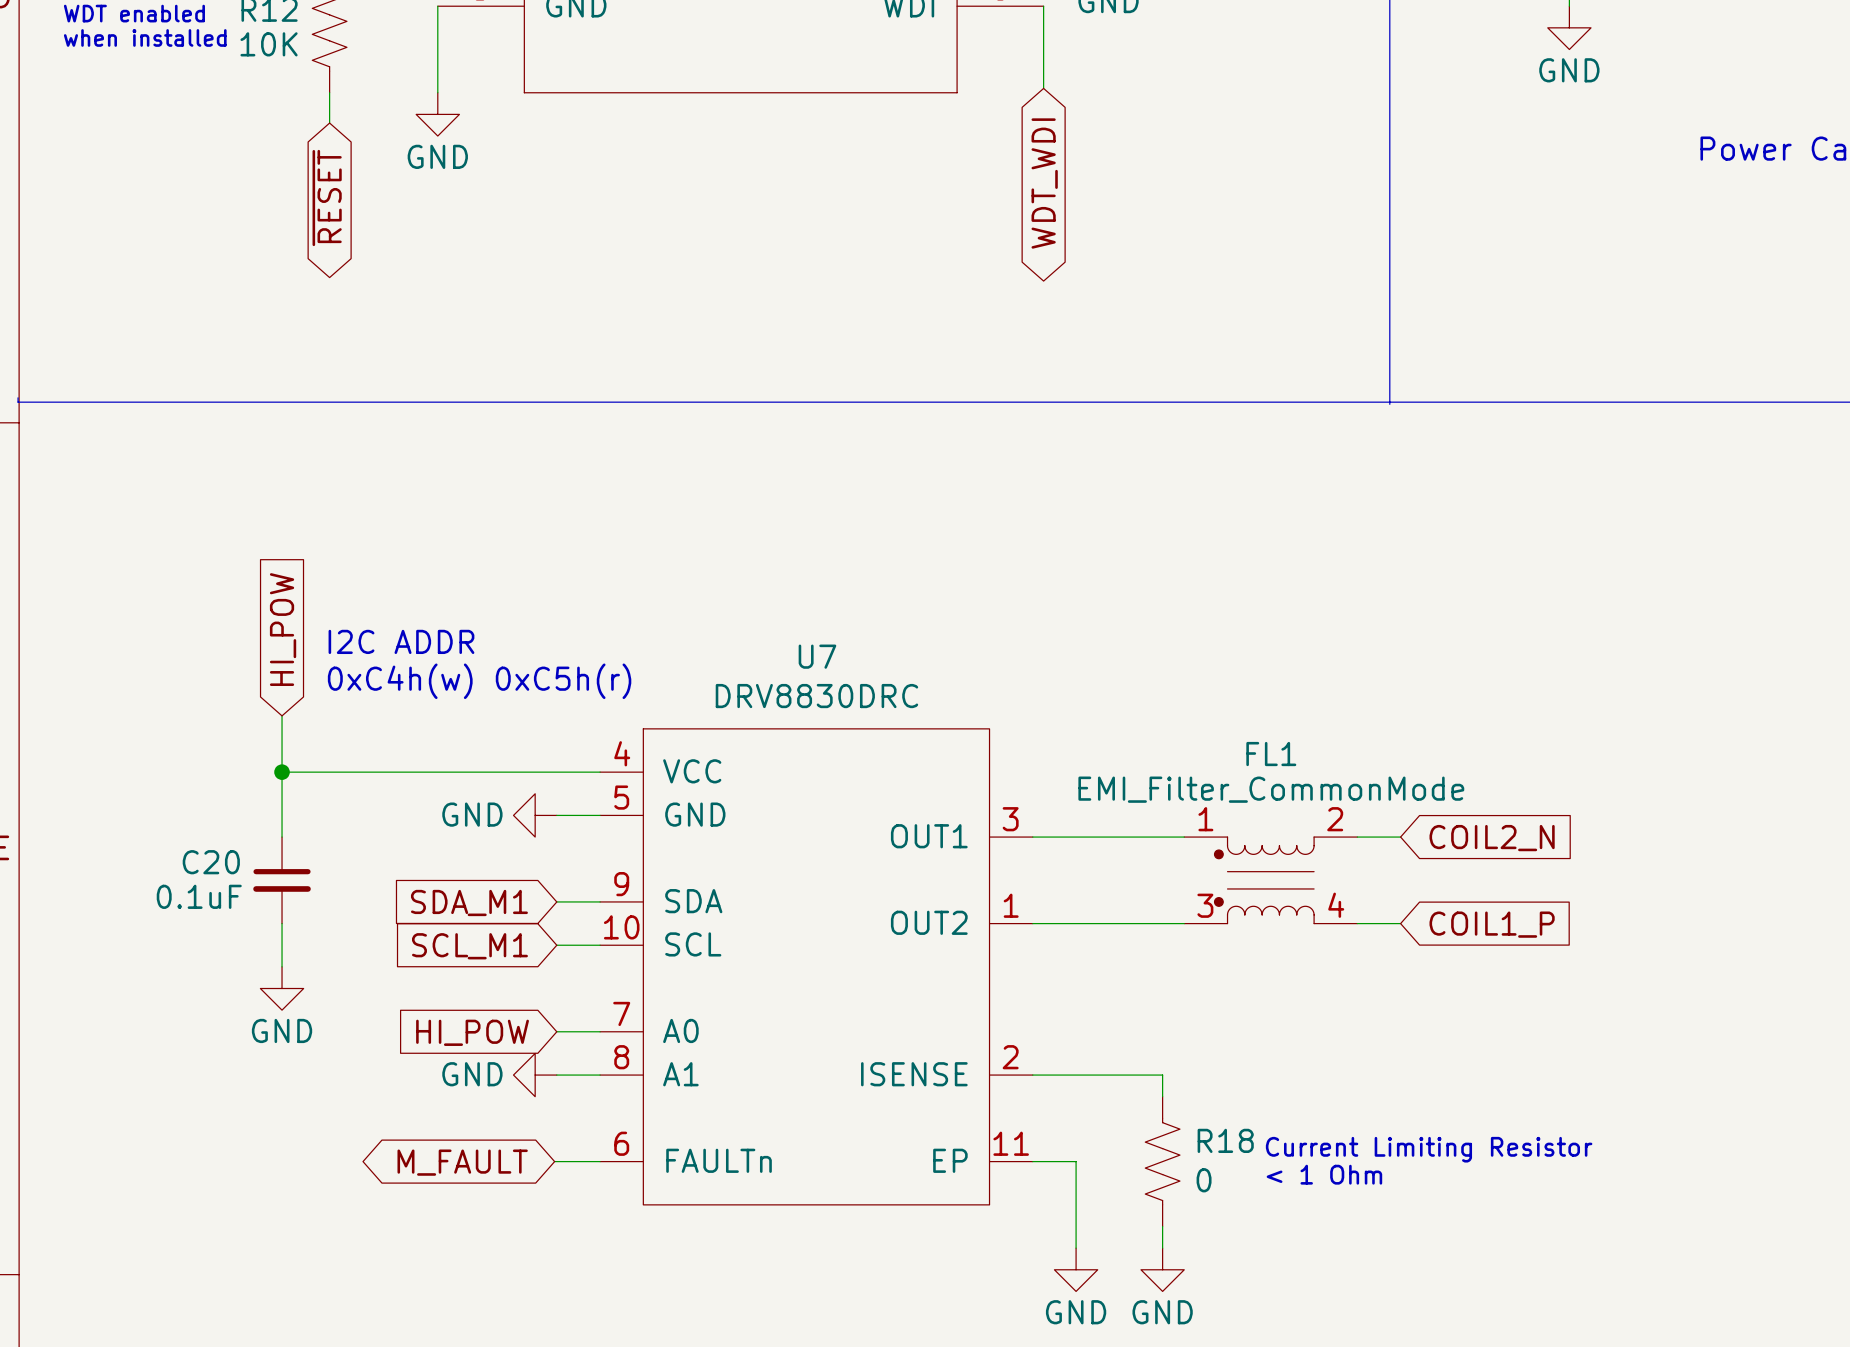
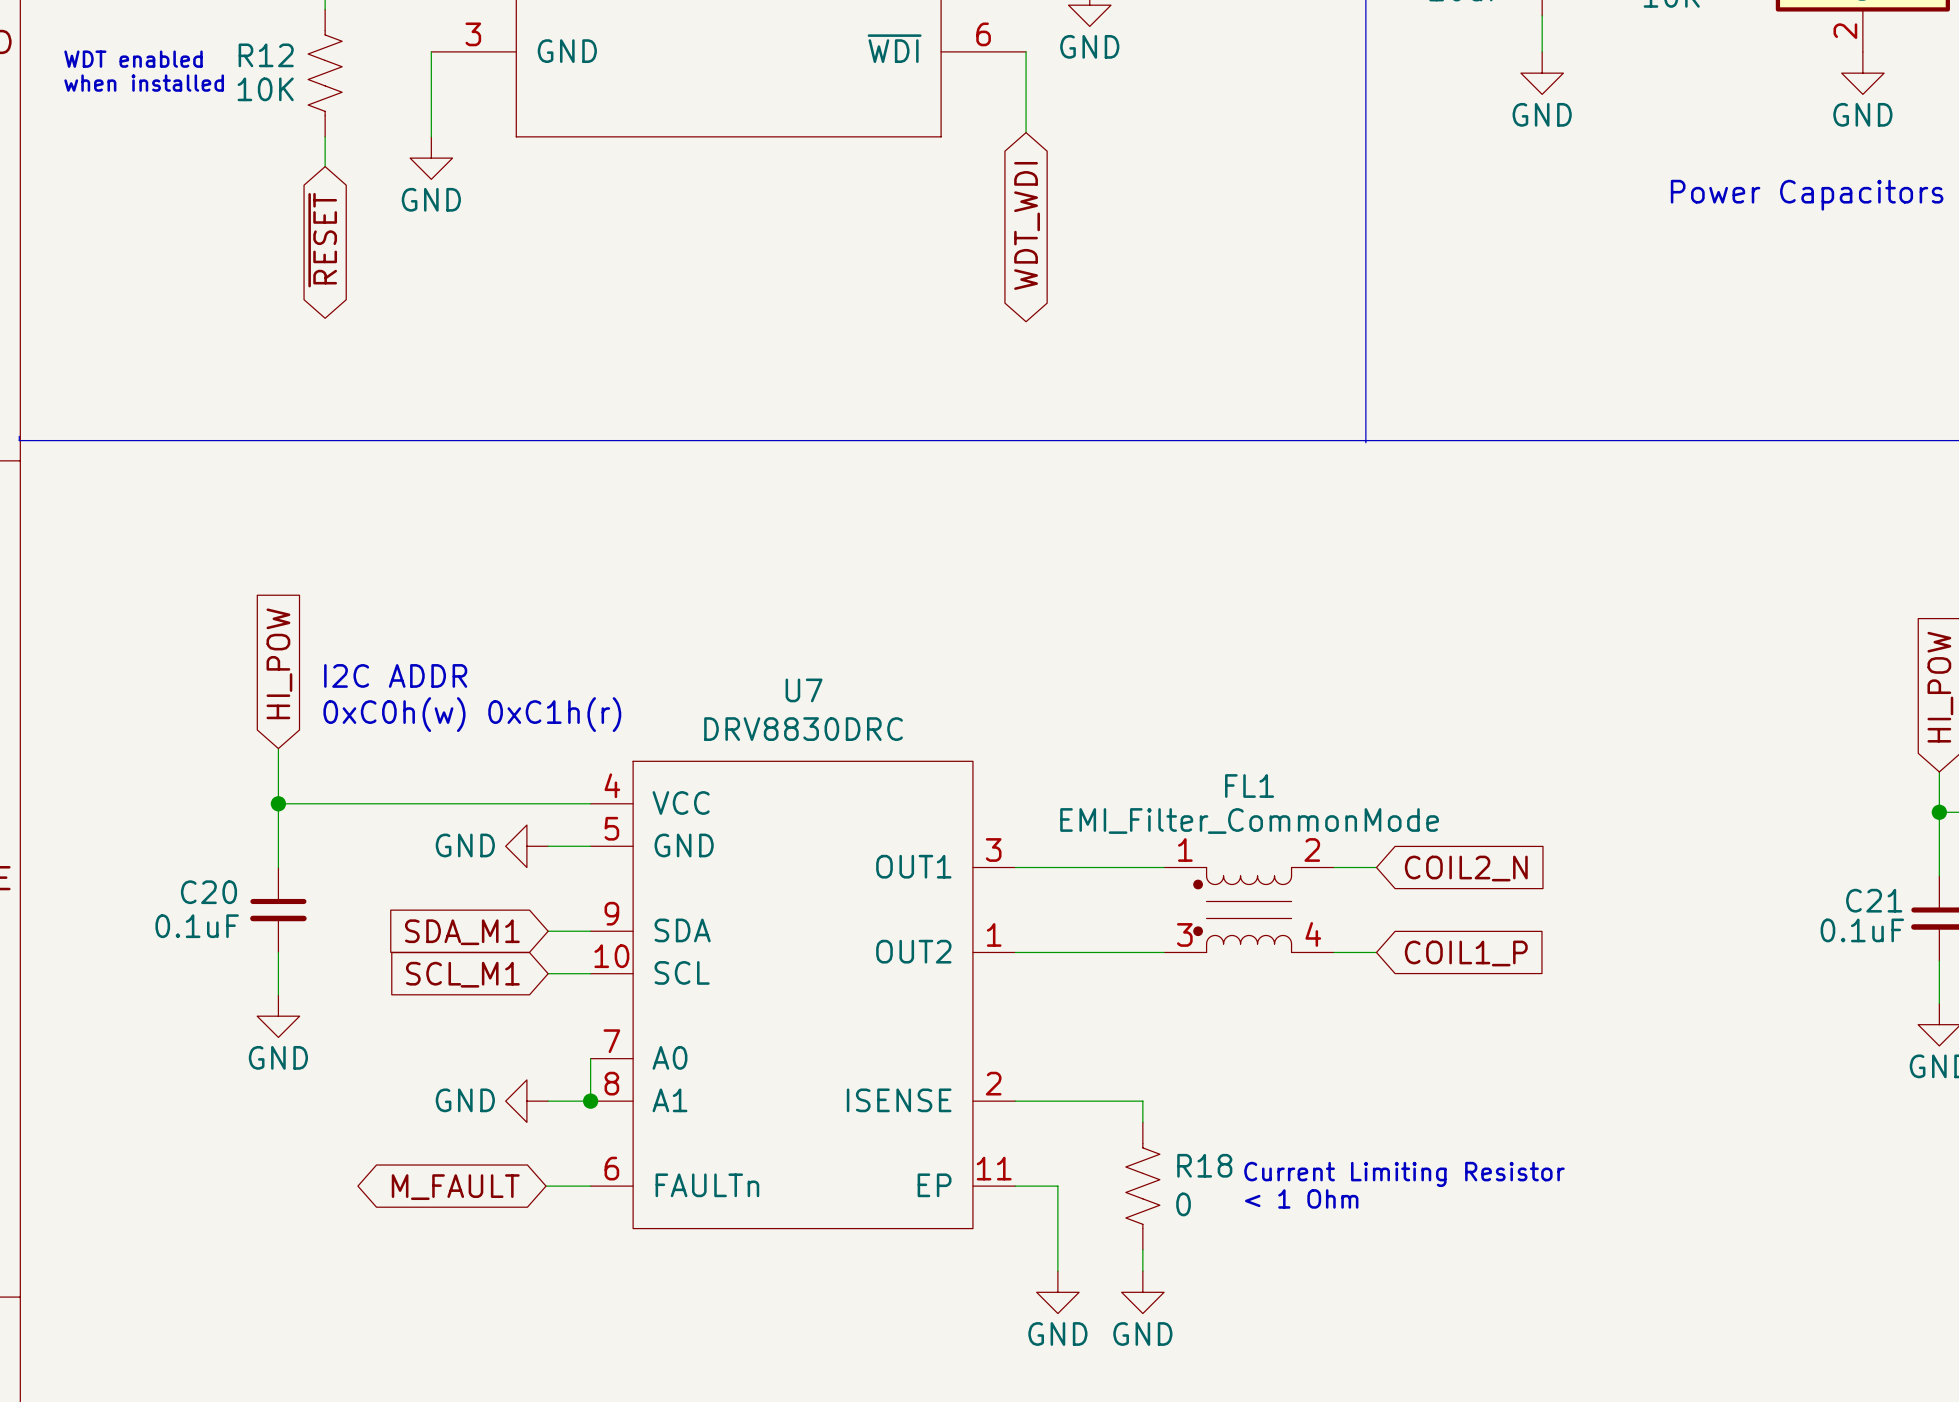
text: 0xC4h(w) 0xC5h(r) (479, 681) -> 0xC0h(w) 0xC1h(r) (472, 714)
wire: (556, 1031) (600, 1031) -> (590, 1101) (590, 1058)
global label: HI_POW (472, 1032) -> none
junction: none -> (590, 1101)

